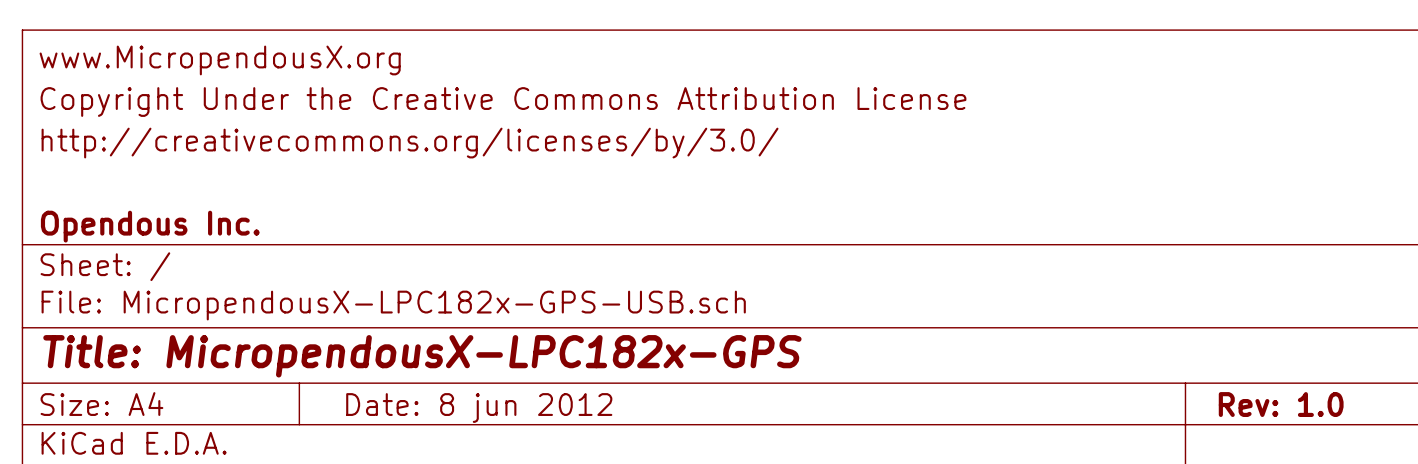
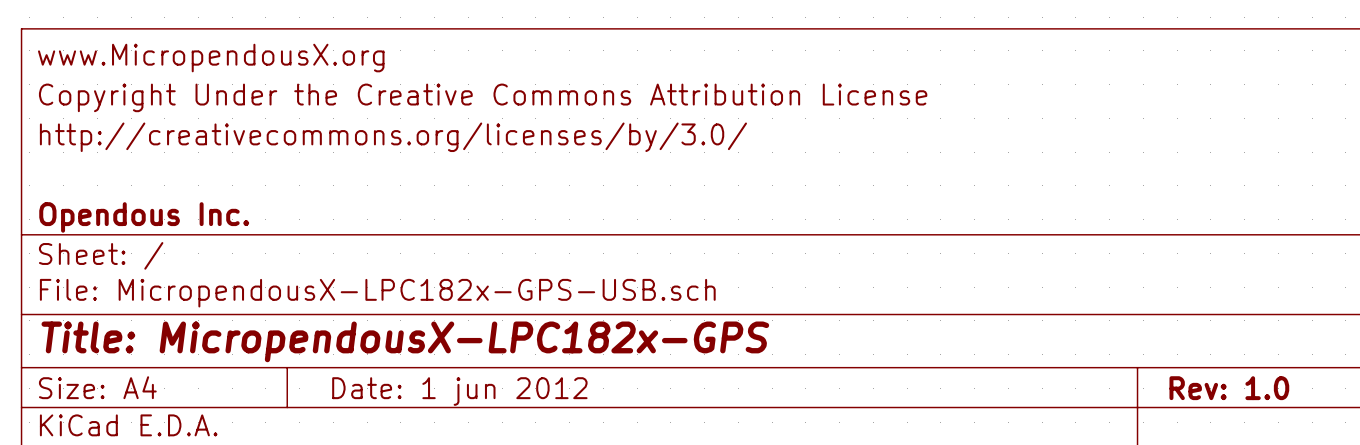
title block: Date: 8 jun 2012 (479, 407) -> Date: 1 jun 2012 (459, 391)

